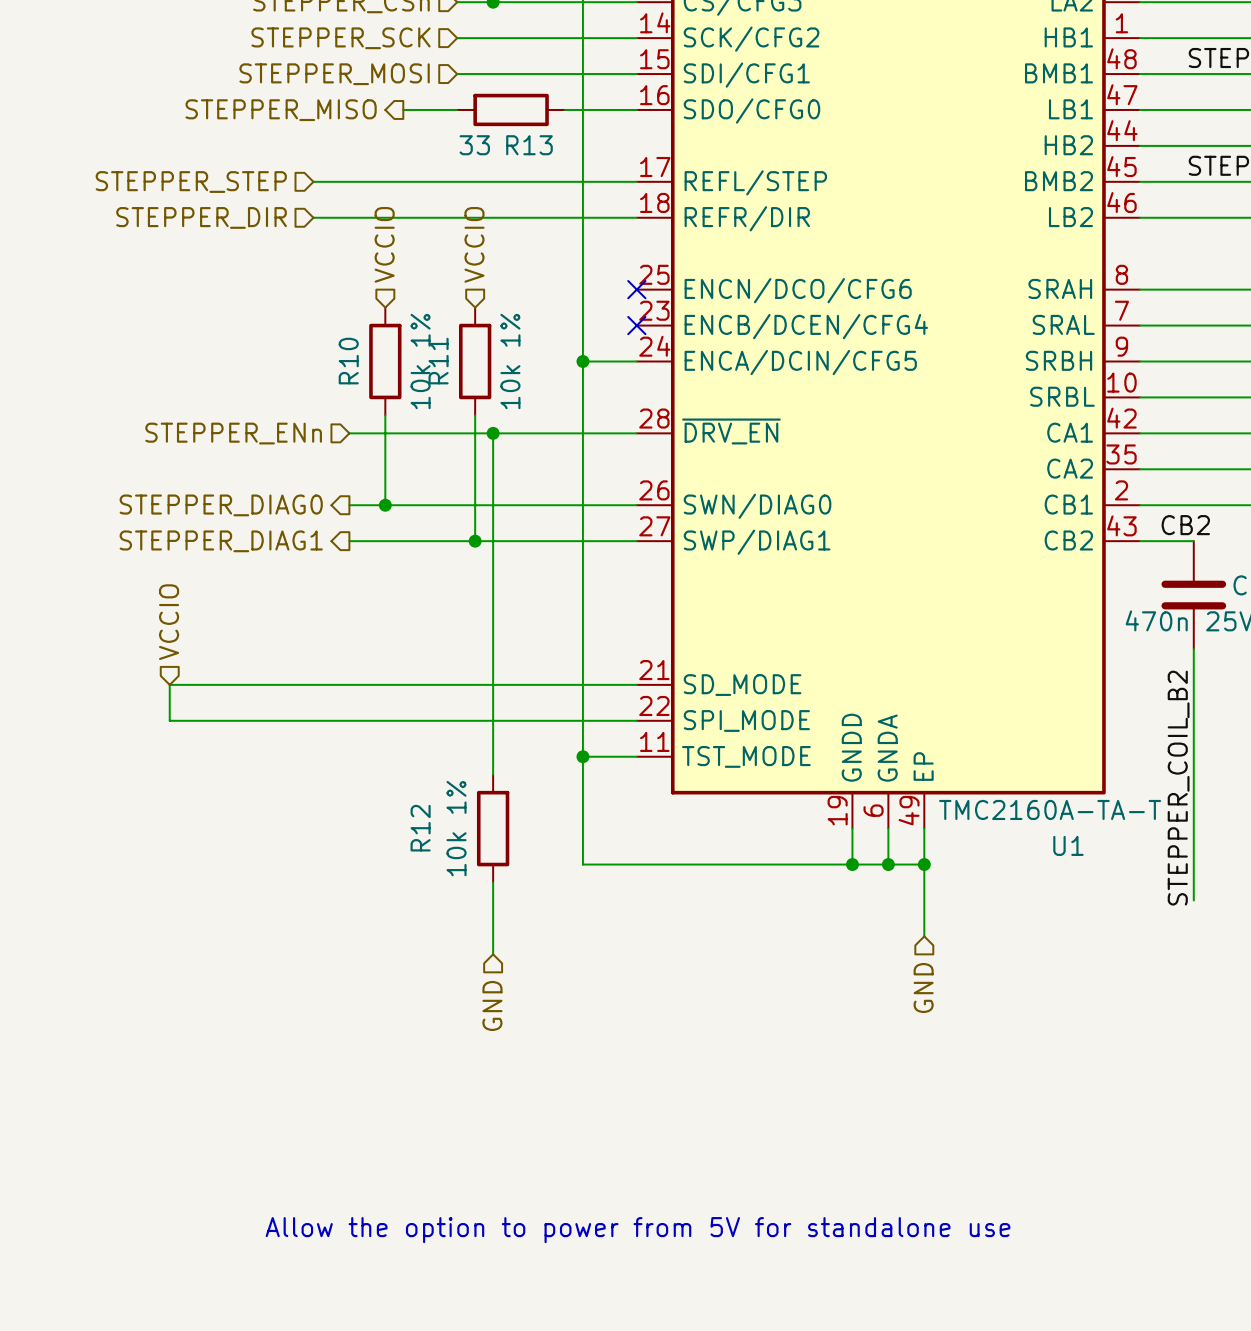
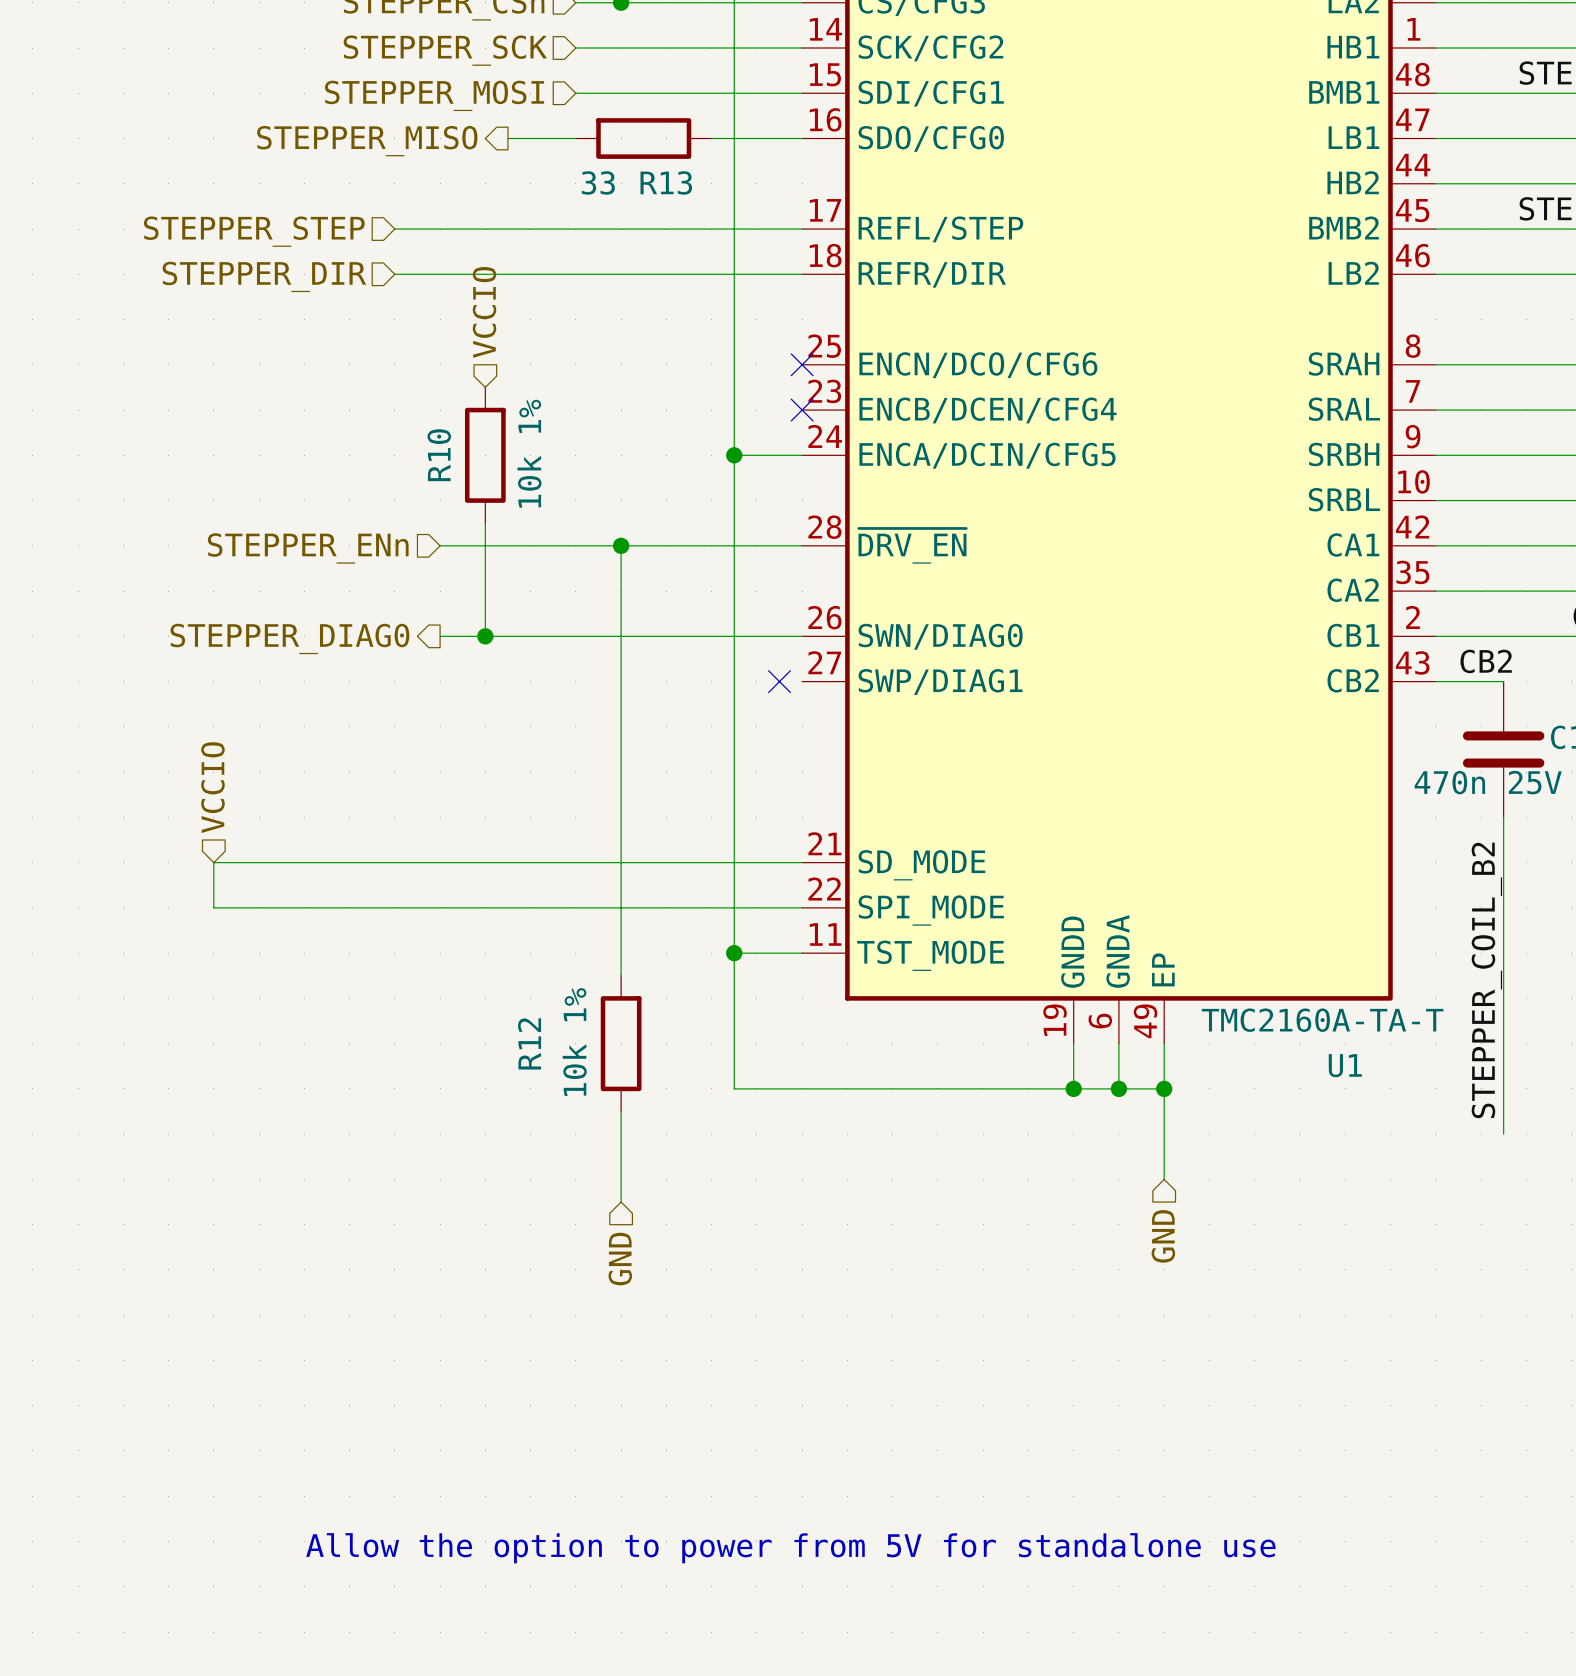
hierarchical label: VCCIO (474, 244) -> none
R11: 10k 1% (475, 361) -> none
wire: (475, 415) (475, 541) -> none
hierarchical label: STEPPER_DIAG1 (221, 541) -> none
wire: (349, 541) (636, 541) -> none
junction: (475, 541) -> none
no-connect mark: none -> (779, 681)

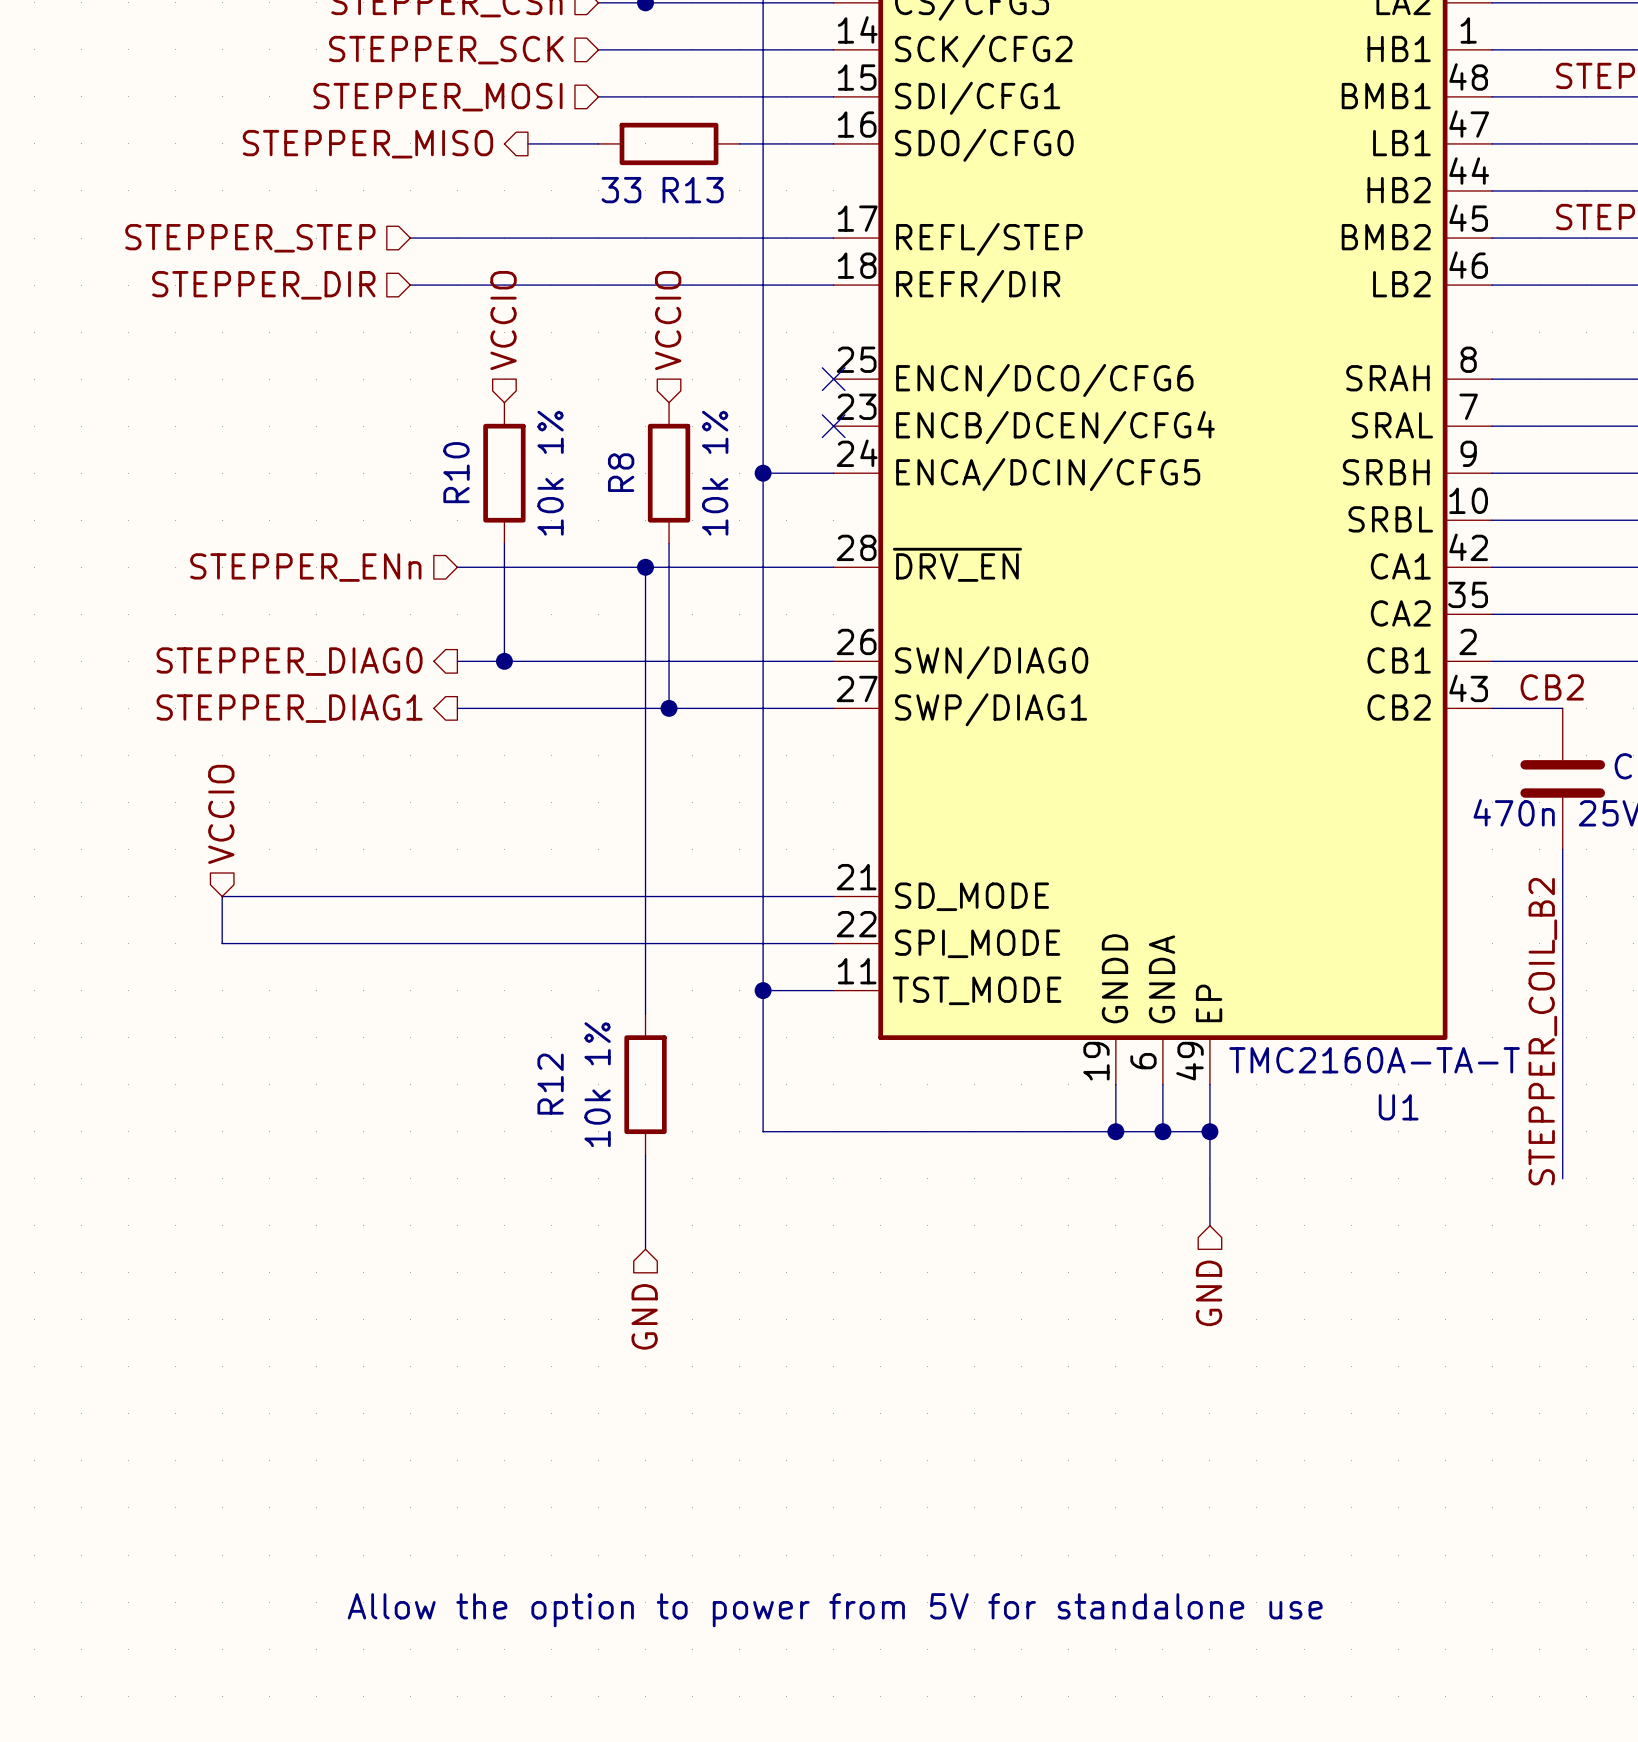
hierarchical label: none -> VCCIO (668, 320)
R8: none -> 10k 1% (669, 473)
wire: none -> (669, 543) (669, 708)
wire: none -> (457, 708) (833, 708)
junction: none -> (669, 708)
no-connect mark: (779, 681) -> none
hierarchical label: none -> STEPPER_DIAG1 (289, 708)

